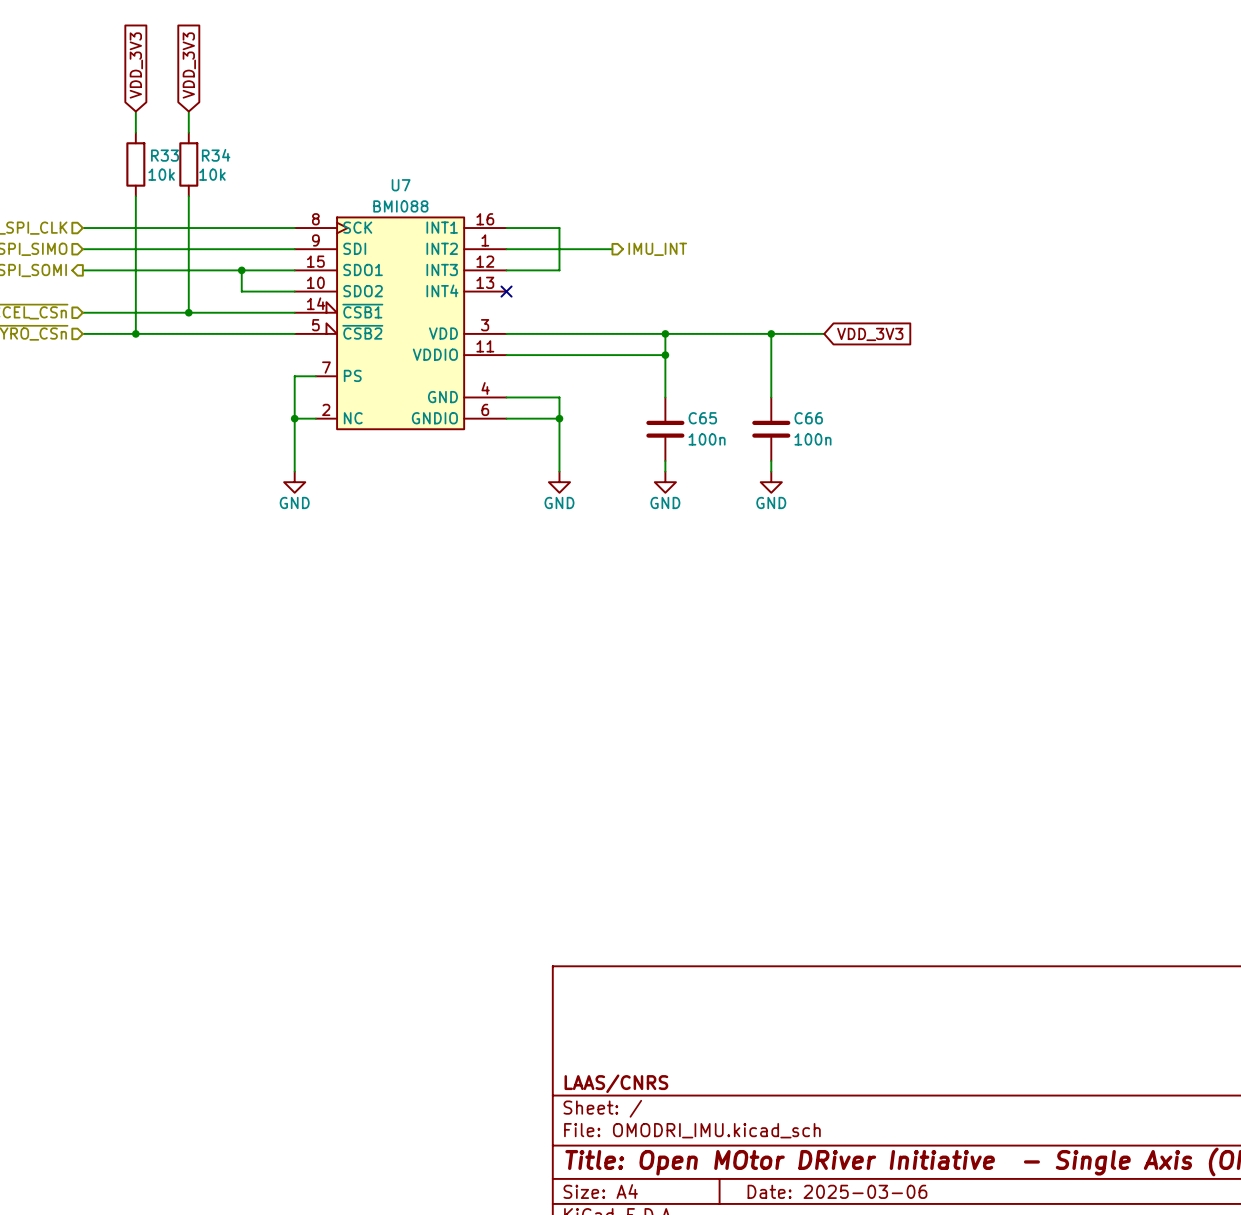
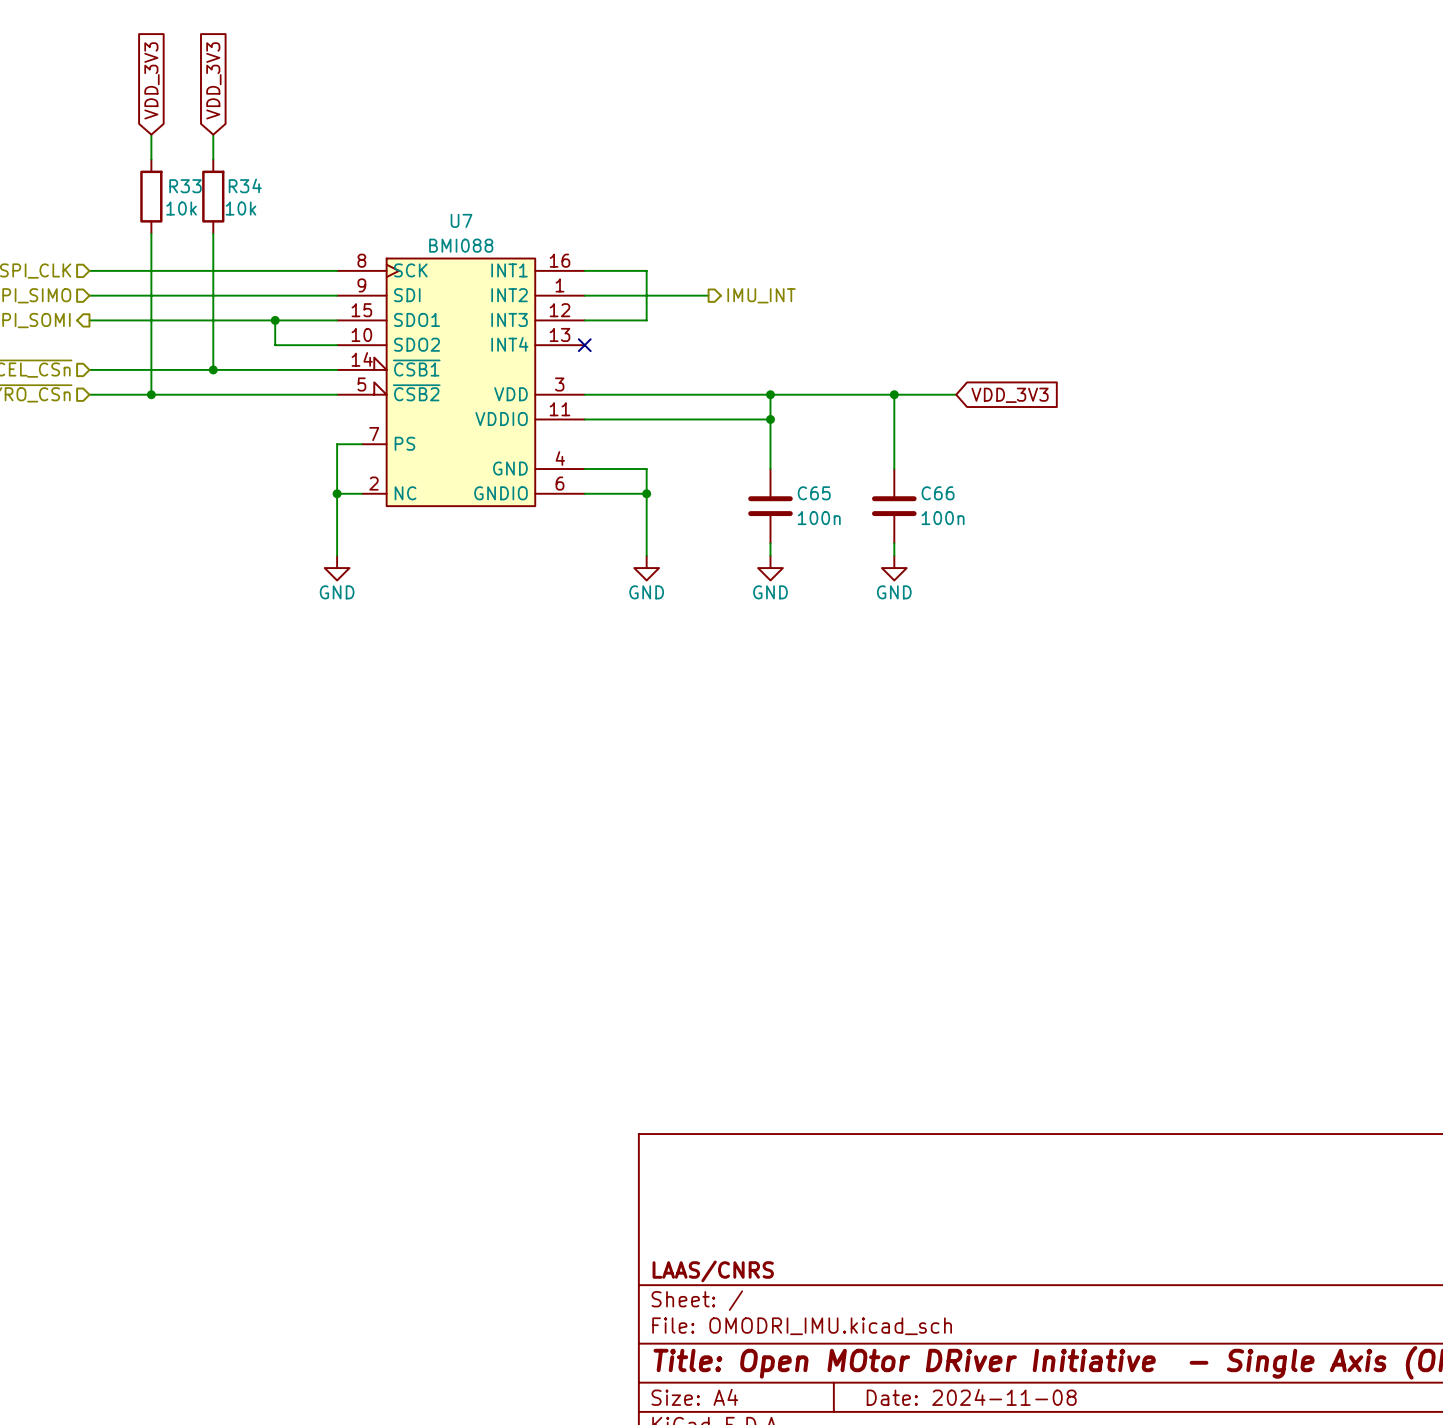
title block: Date: 2025-03-06 (837, 1191) -> Date: 2024-11-08 (971, 1397)

